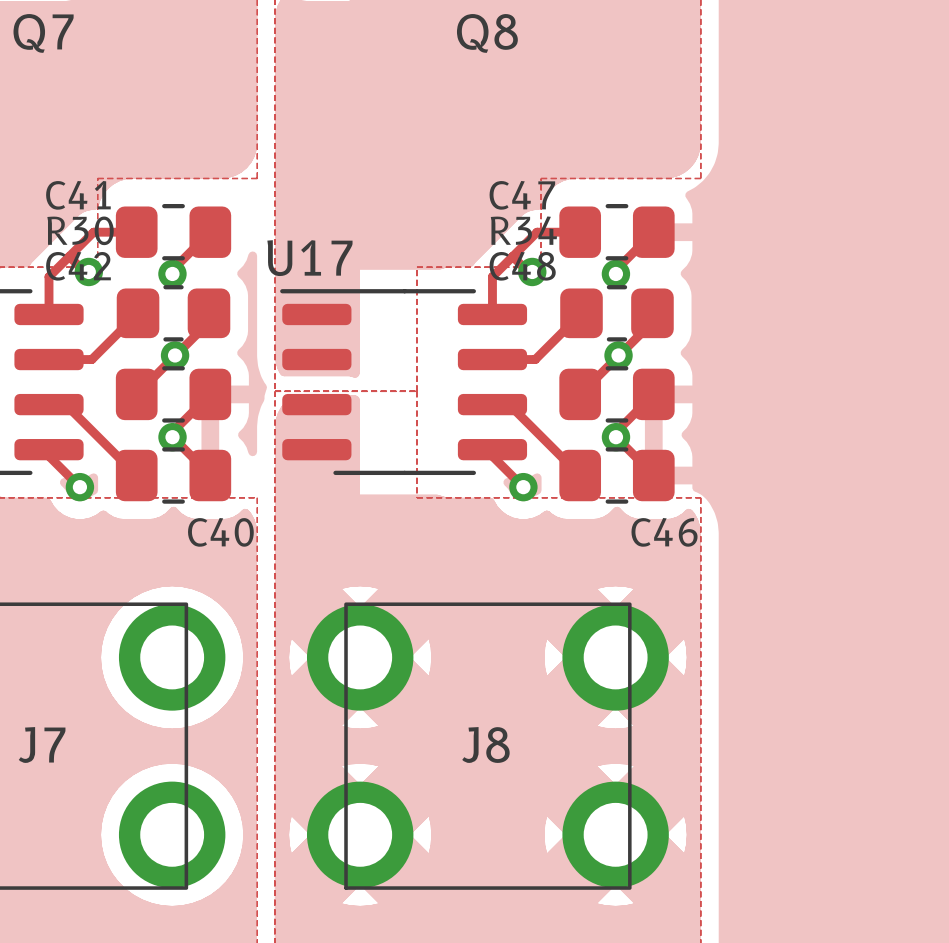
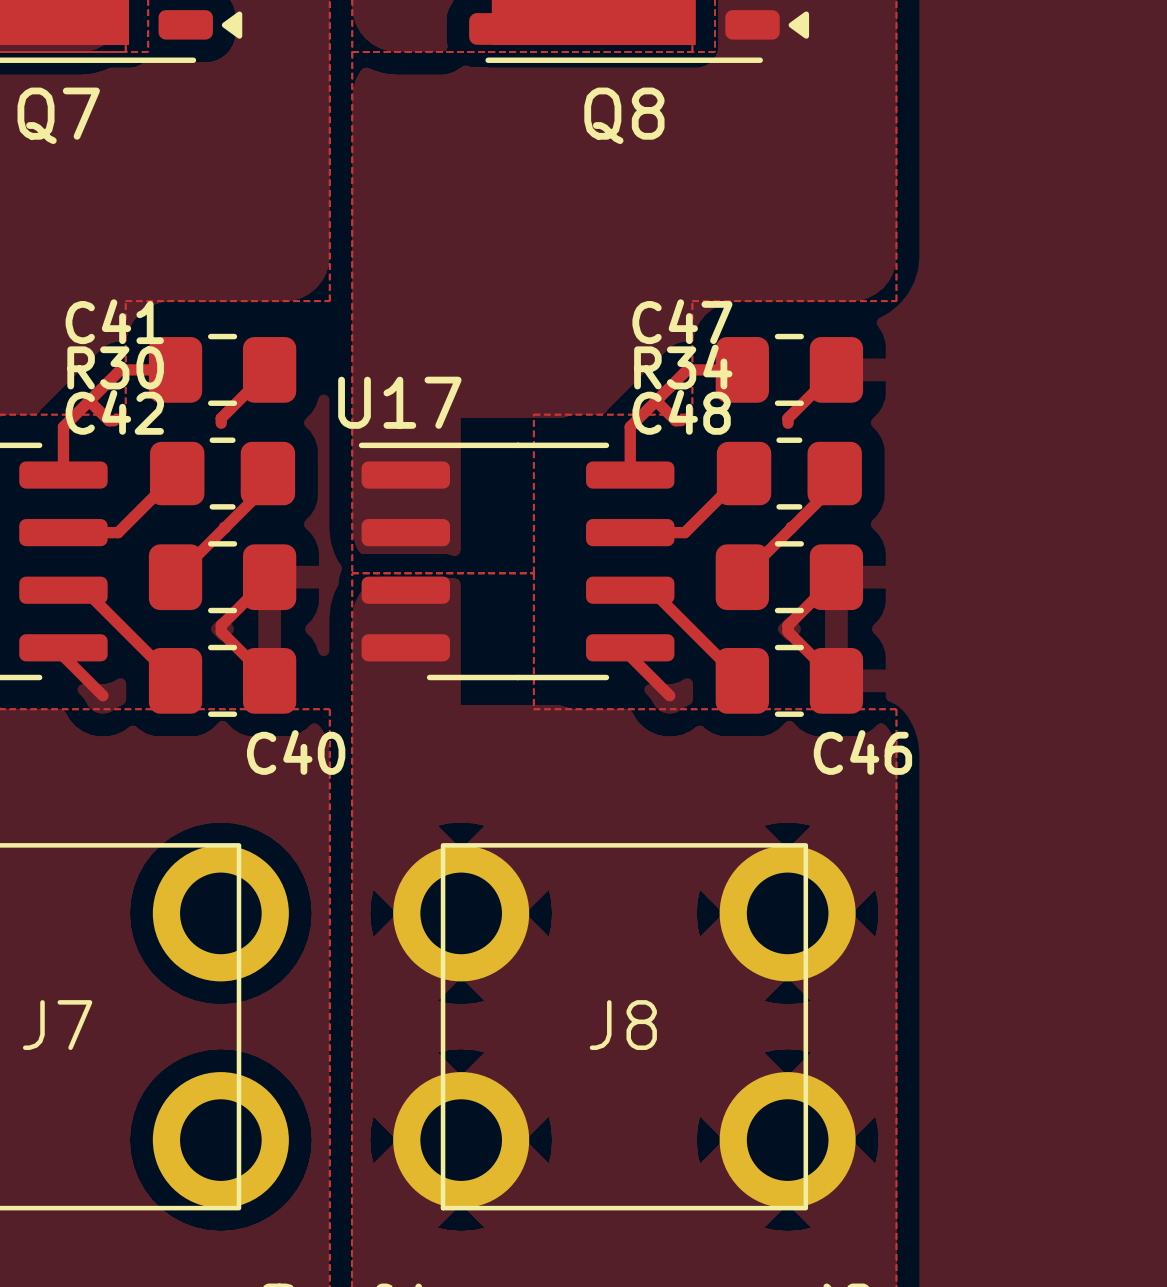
via: (88, 271) -> none
via: (532, 271) -> none
via: (172, 273) -> none
via: (615, 273) -> none
via: (175, 355) -> none
via: (618, 355) -> none
via: (172, 437) -> none
via: (615, 437) -> none
via: (79, 487) -> none
via: (523, 487) -> none

